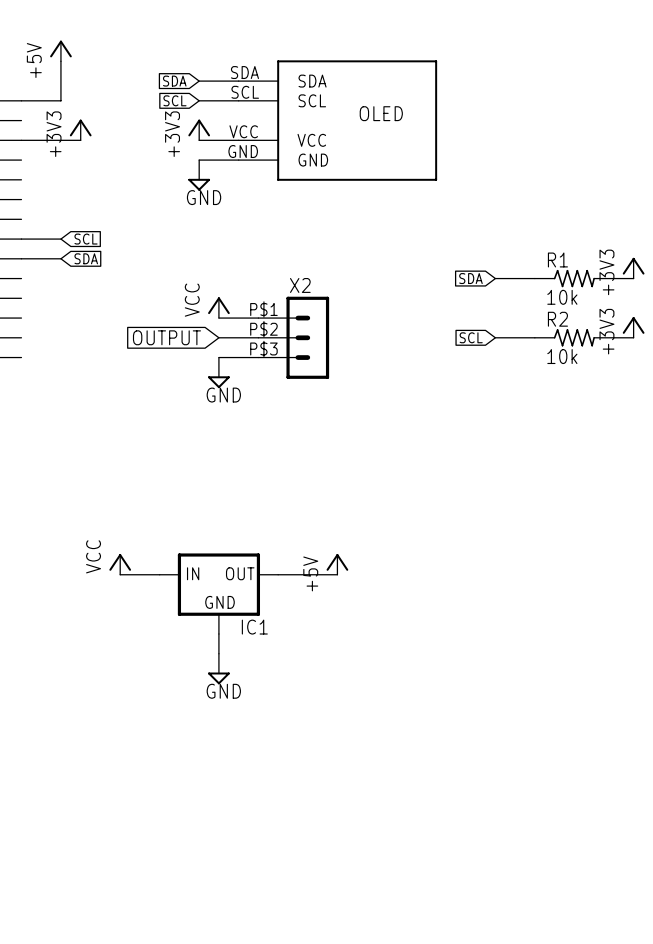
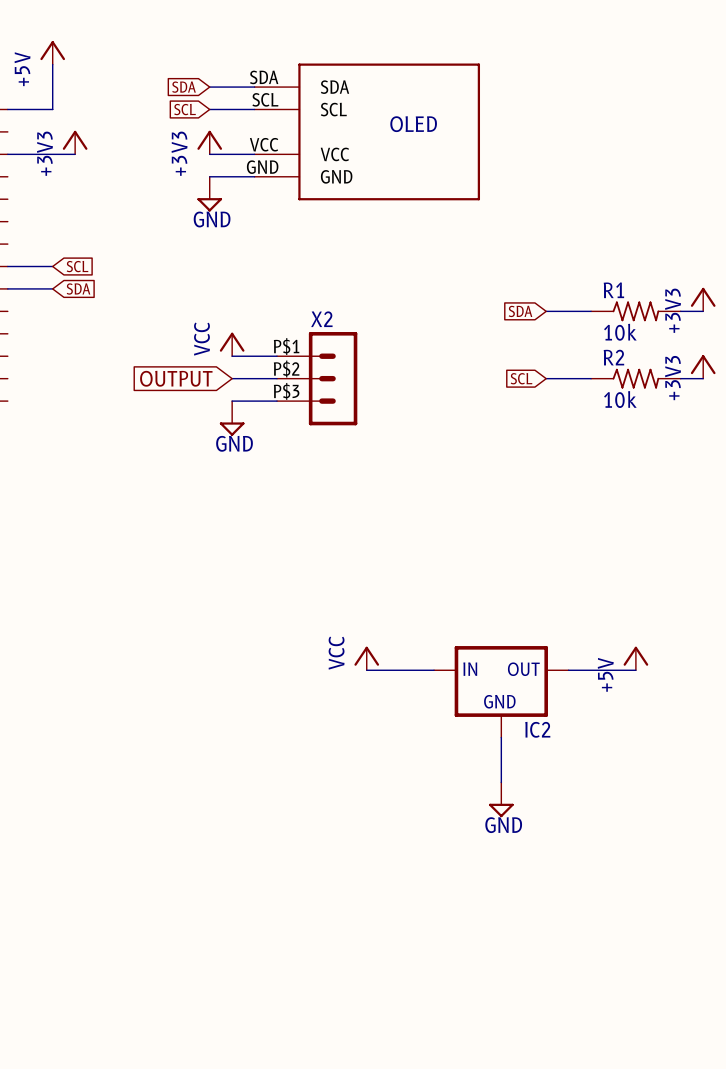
power symbol: VCC (120, 564) -> none
power symbol: +5V (337, 564) -> none
wire: (120, 574) (159, 574) -> none
wire: (278, 574) (337, 574) -> (366, 670) (434, 670)
power symbol: none -> VCC (366, 658)
power symbol: none -> +5V (635, 658)
IC1: (218, 593) -> none
wire: none -> (568, 670) (635, 670)
IC2: none -> (501, 691)
wire: (218, 634) (218, 653) -> none
wire: none -> (501, 737) (501, 782)
power symbol: GND (218, 669) -> none
power symbol: none -> GND (501, 799)

